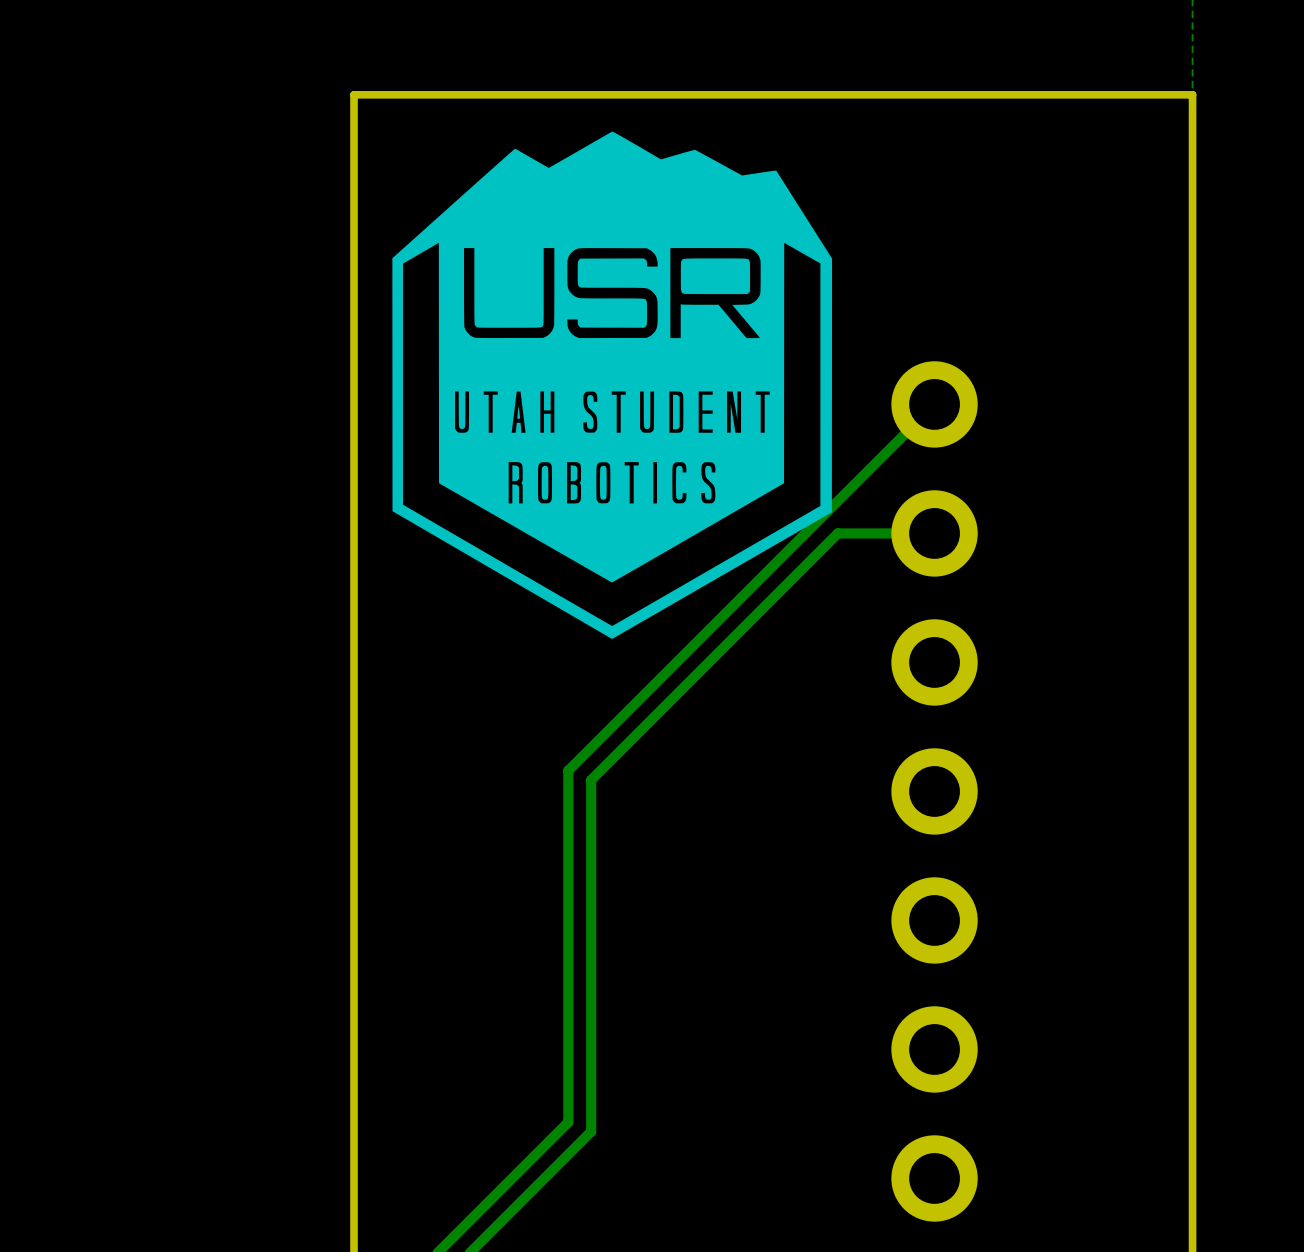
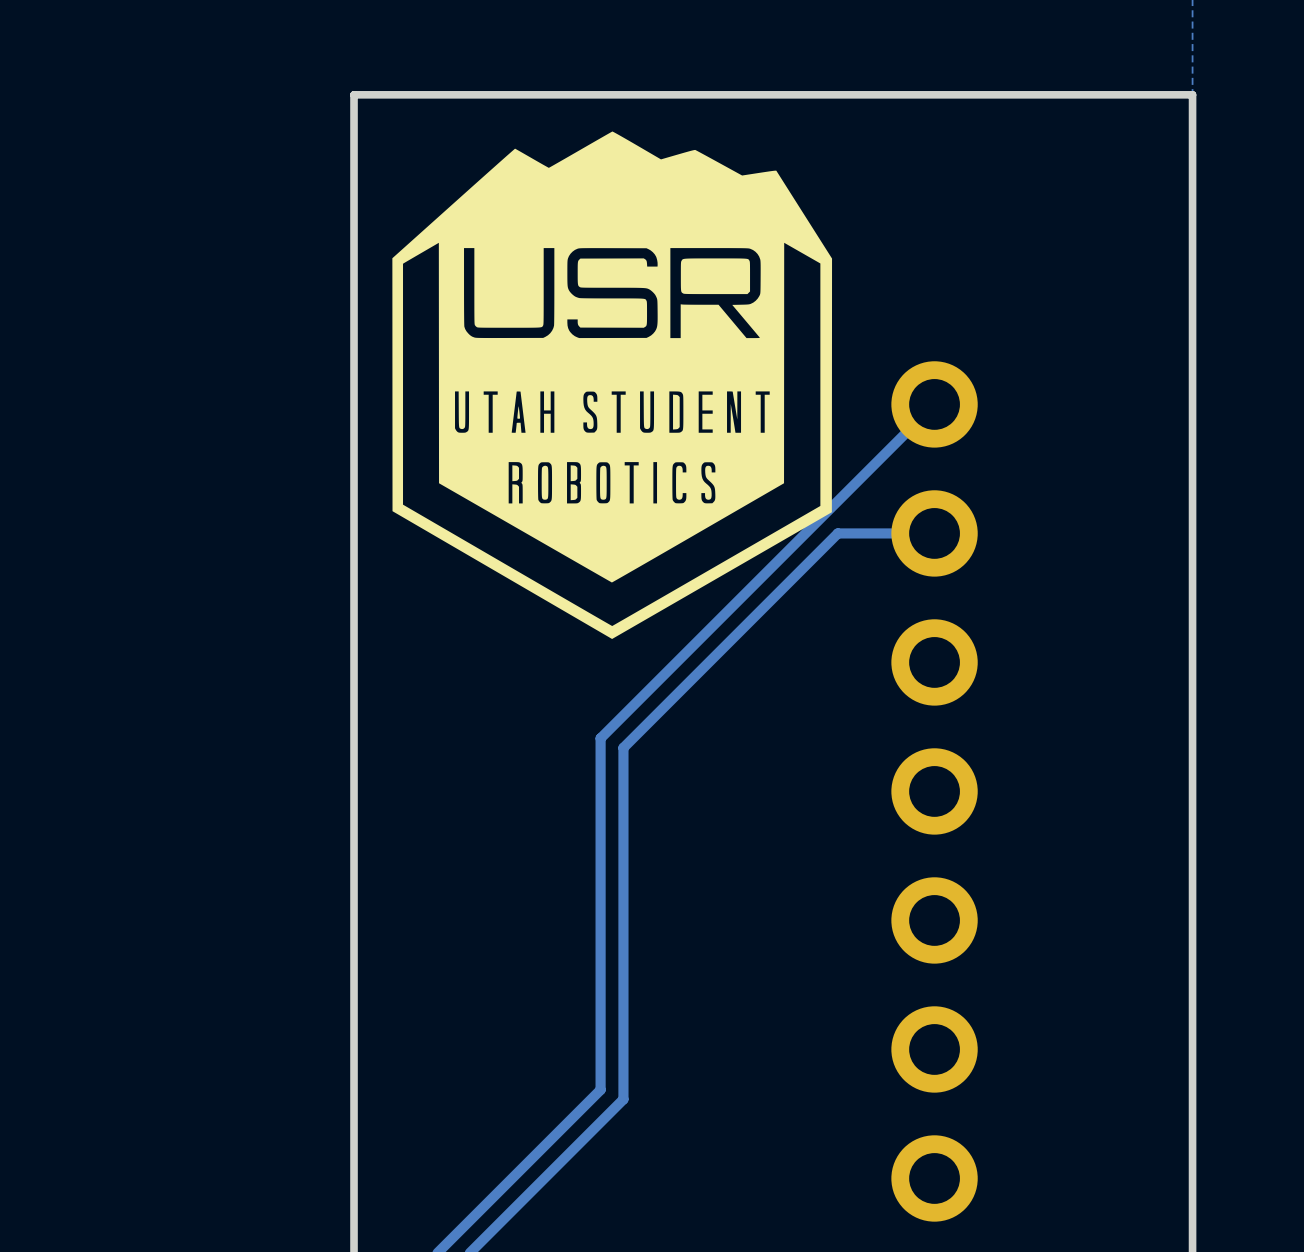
bottom track: (600, 738) (568, 770) (568, 1122) -> (600, 738) (600, 1089) (568, 1122)
bottom track: (623, 747) (591, 780) (591, 1131) -> (623, 747) (623, 1099) (591, 1131)

